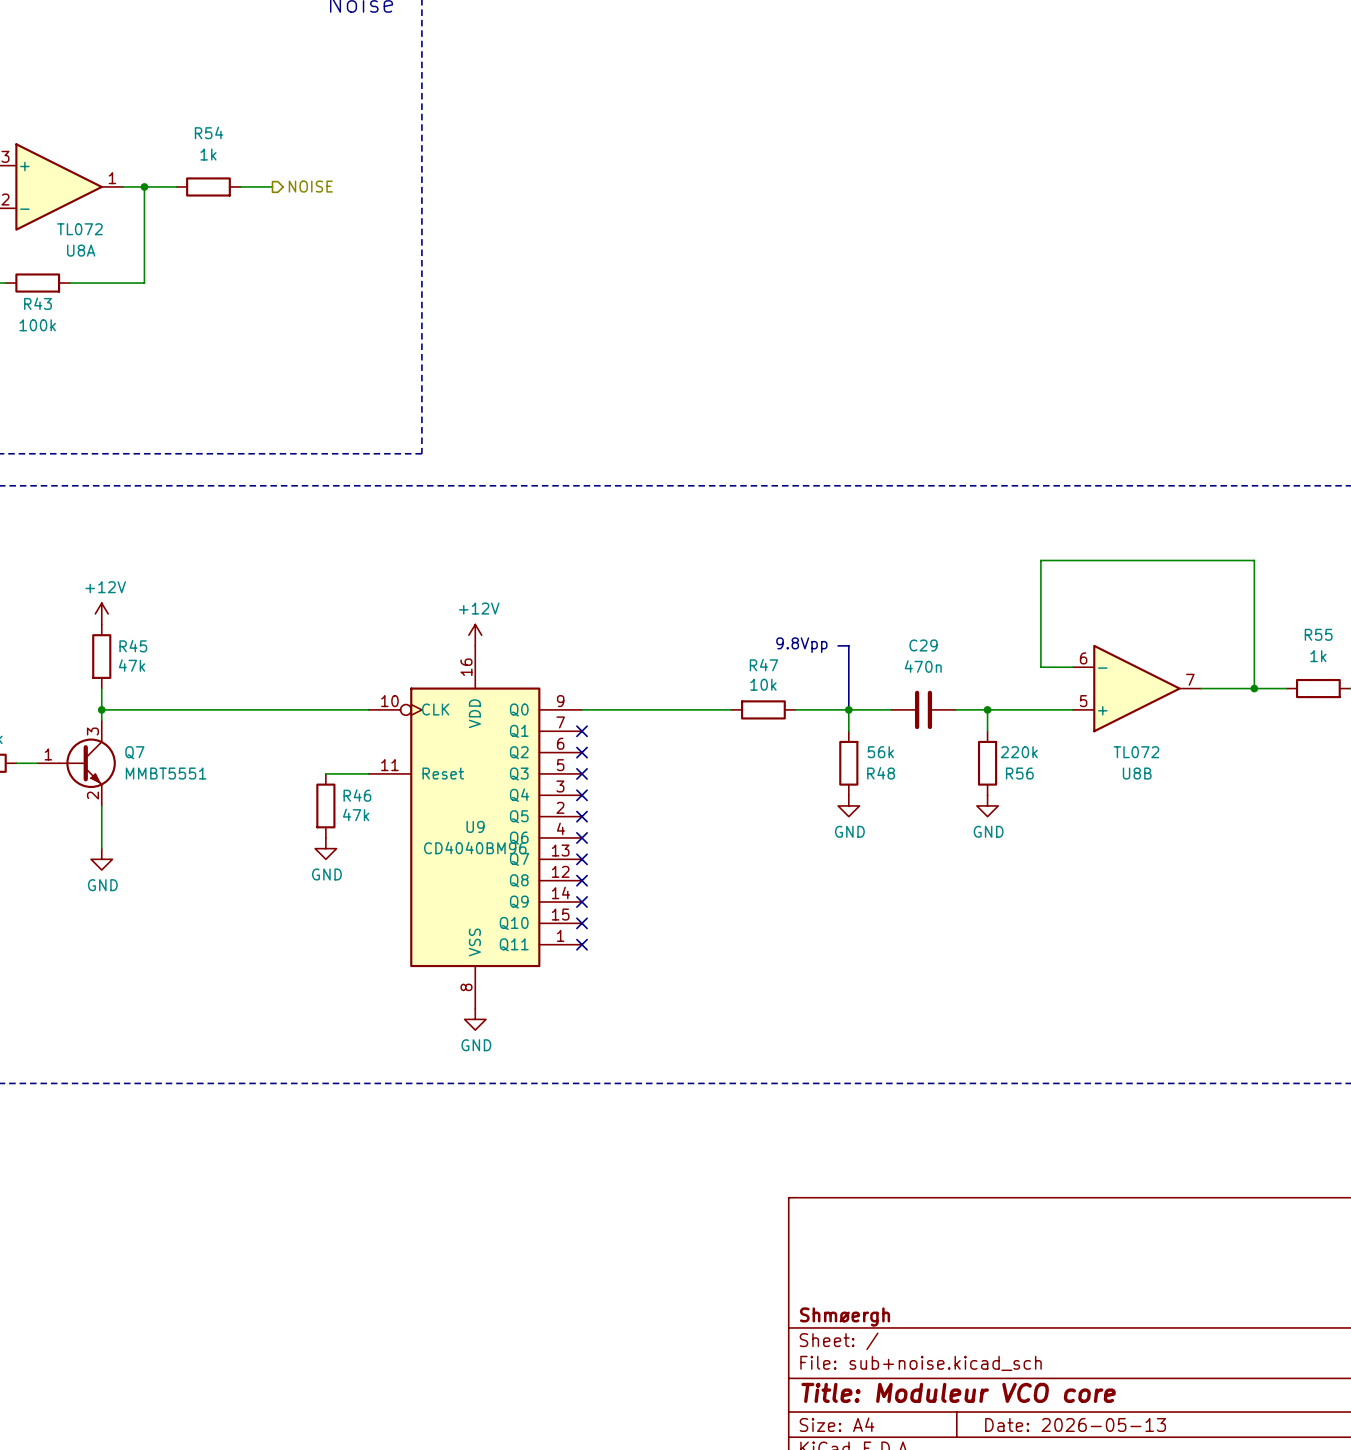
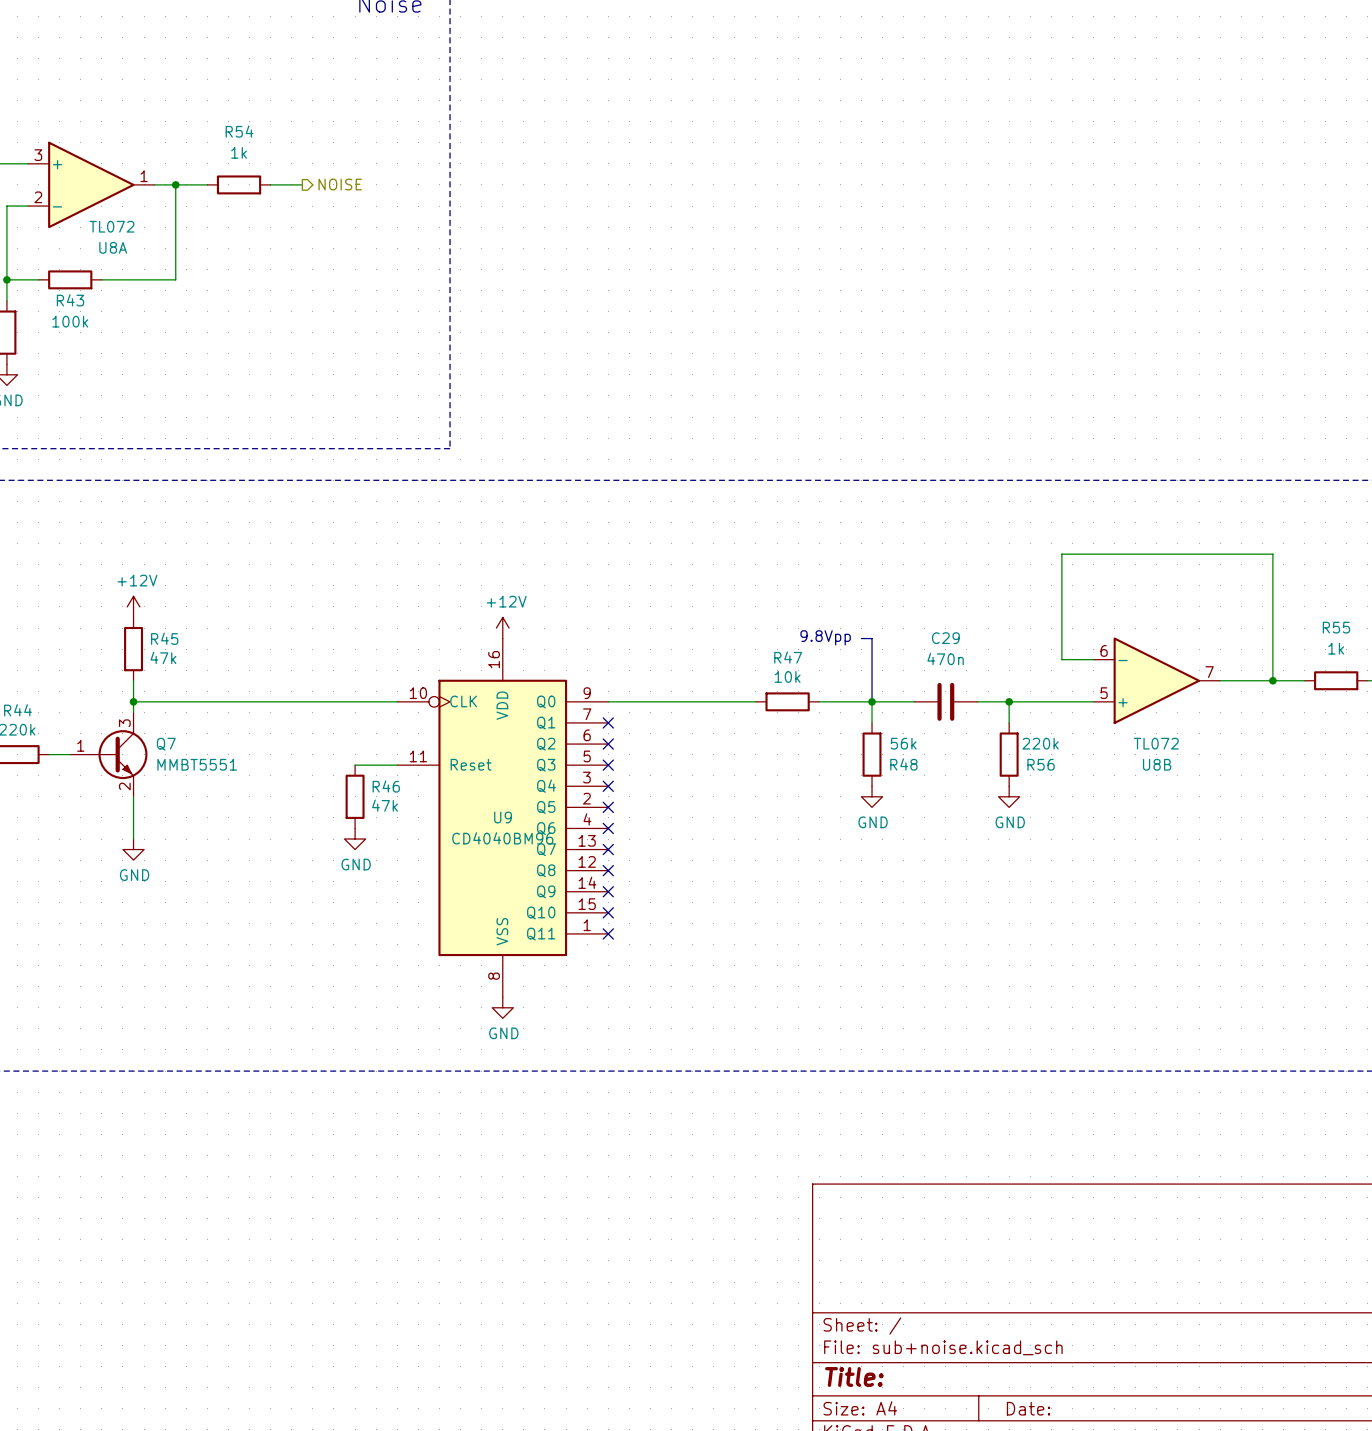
title block: Shmøergh (845, 1317) -> none
title block: Title: Moduleur VCO core (958, 1392) -> Title: (854, 1376)
title block: Date: 2026-05-13 (1075, 1424) -> Date: (1028, 1408)

